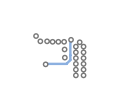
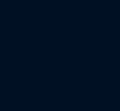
via: (36, 36) -> none
via: (71, 39) -> none
via: (40, 41) -> none
via: (47, 41) -> none
via: (52, 41) -> none
via: (58, 41) -> none
via: (64, 41) -> none
track: (70, 42) (70, 60) (66, 63) (45, 64) -> none
via: (79, 42) -> none
via: (75, 46) -> none
via: (83, 46) -> none
via: (64, 49) -> none
via: (75, 52) -> none
via: (83, 52) -> none
via: (64, 57) -> none
via: (75, 58) -> none
via: (83, 58) -> none
via: (75, 63) -> none
via: (83, 63) -> none
via: (45, 64) -> none
via: (75, 69) -> none
via: (83, 69) -> none
via: (75, 75) -> none
via: (83, 75) -> none

